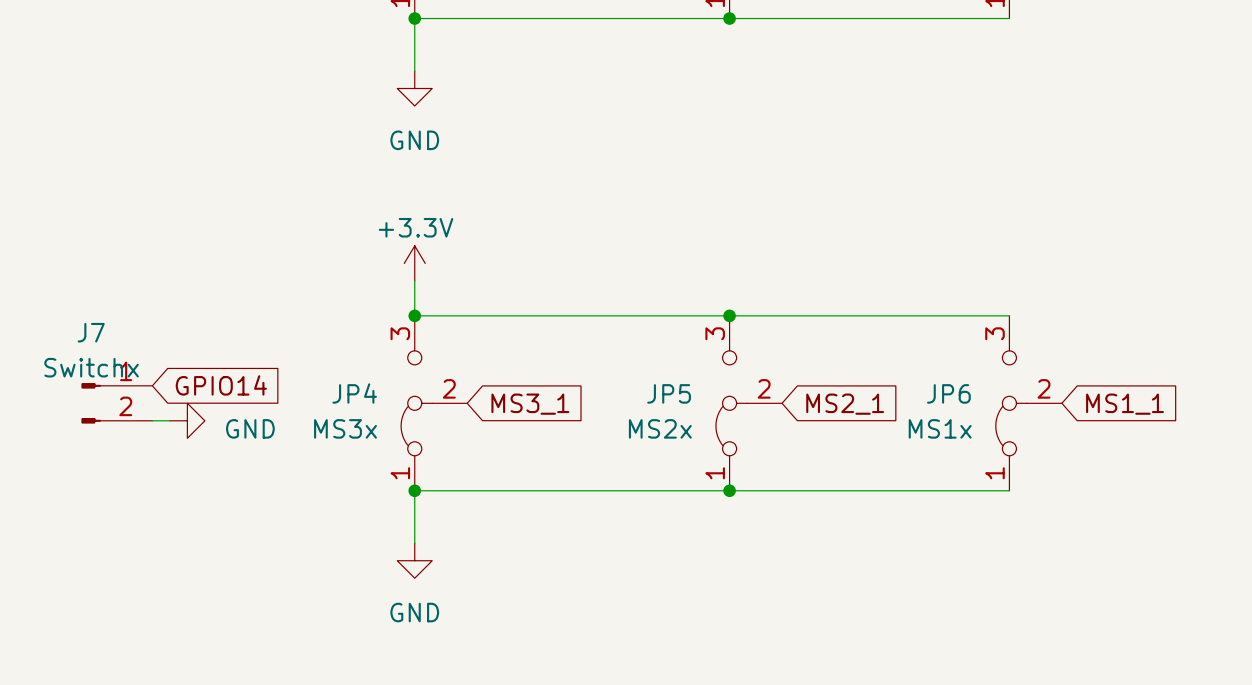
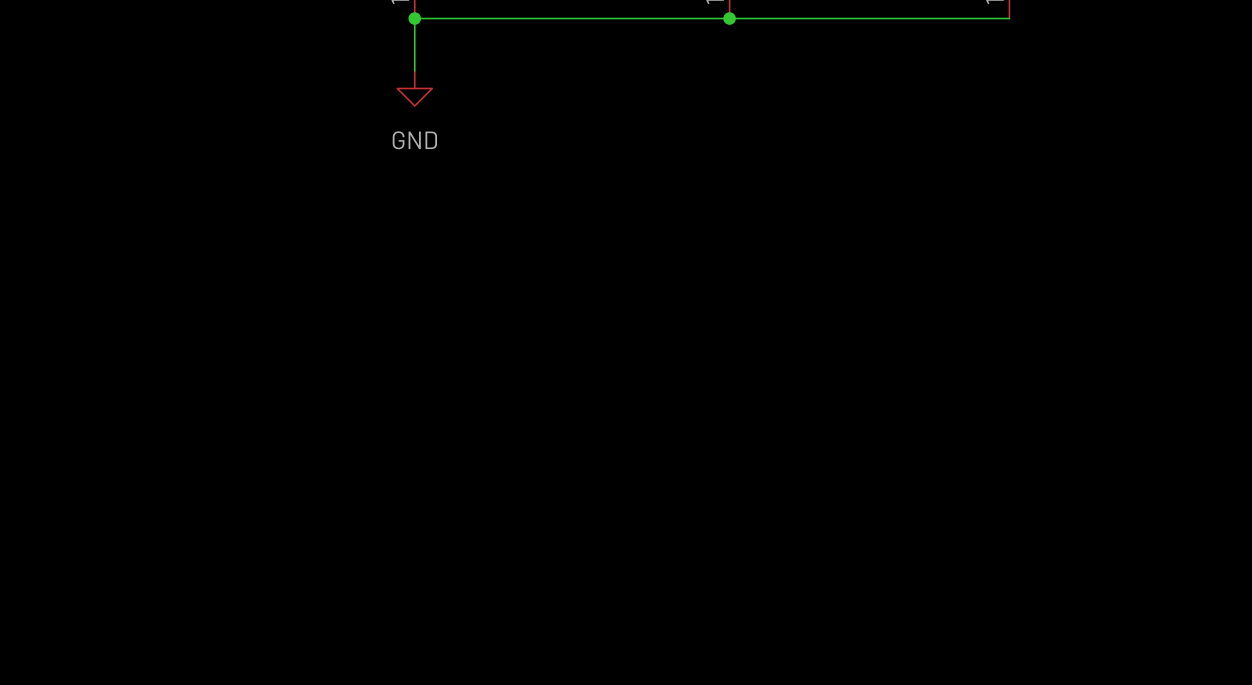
power symbol: +3.3V (414, 263) -> none
wire: (414, 280) (414, 315) (1009, 315) -> none
junction: (414, 315) -> none
junction: (729, 315) -> none
global label: GPIO14 (221, 385) -> none
J7: Switchx (116, 403) -> none
JP4: MS3x (434, 403) -> none
JP5: MS2x (748, 403) -> none
JP6: MS1x (1028, 403) -> none
global label: MS3_1 (530, 404) -> none
global label: MS2_1 (845, 404) -> none
global label: MS1_1 (1125, 404) -> none
wire: (152, 420) (169, 420) -> none
power symbol: GND (187, 420) -> none
junction: (414, 490) -> none
junction: (729, 490) -> none
wire: (1009, 490) (414, 490) (414, 543) -> none
power symbol: GND (414, 560) -> none

